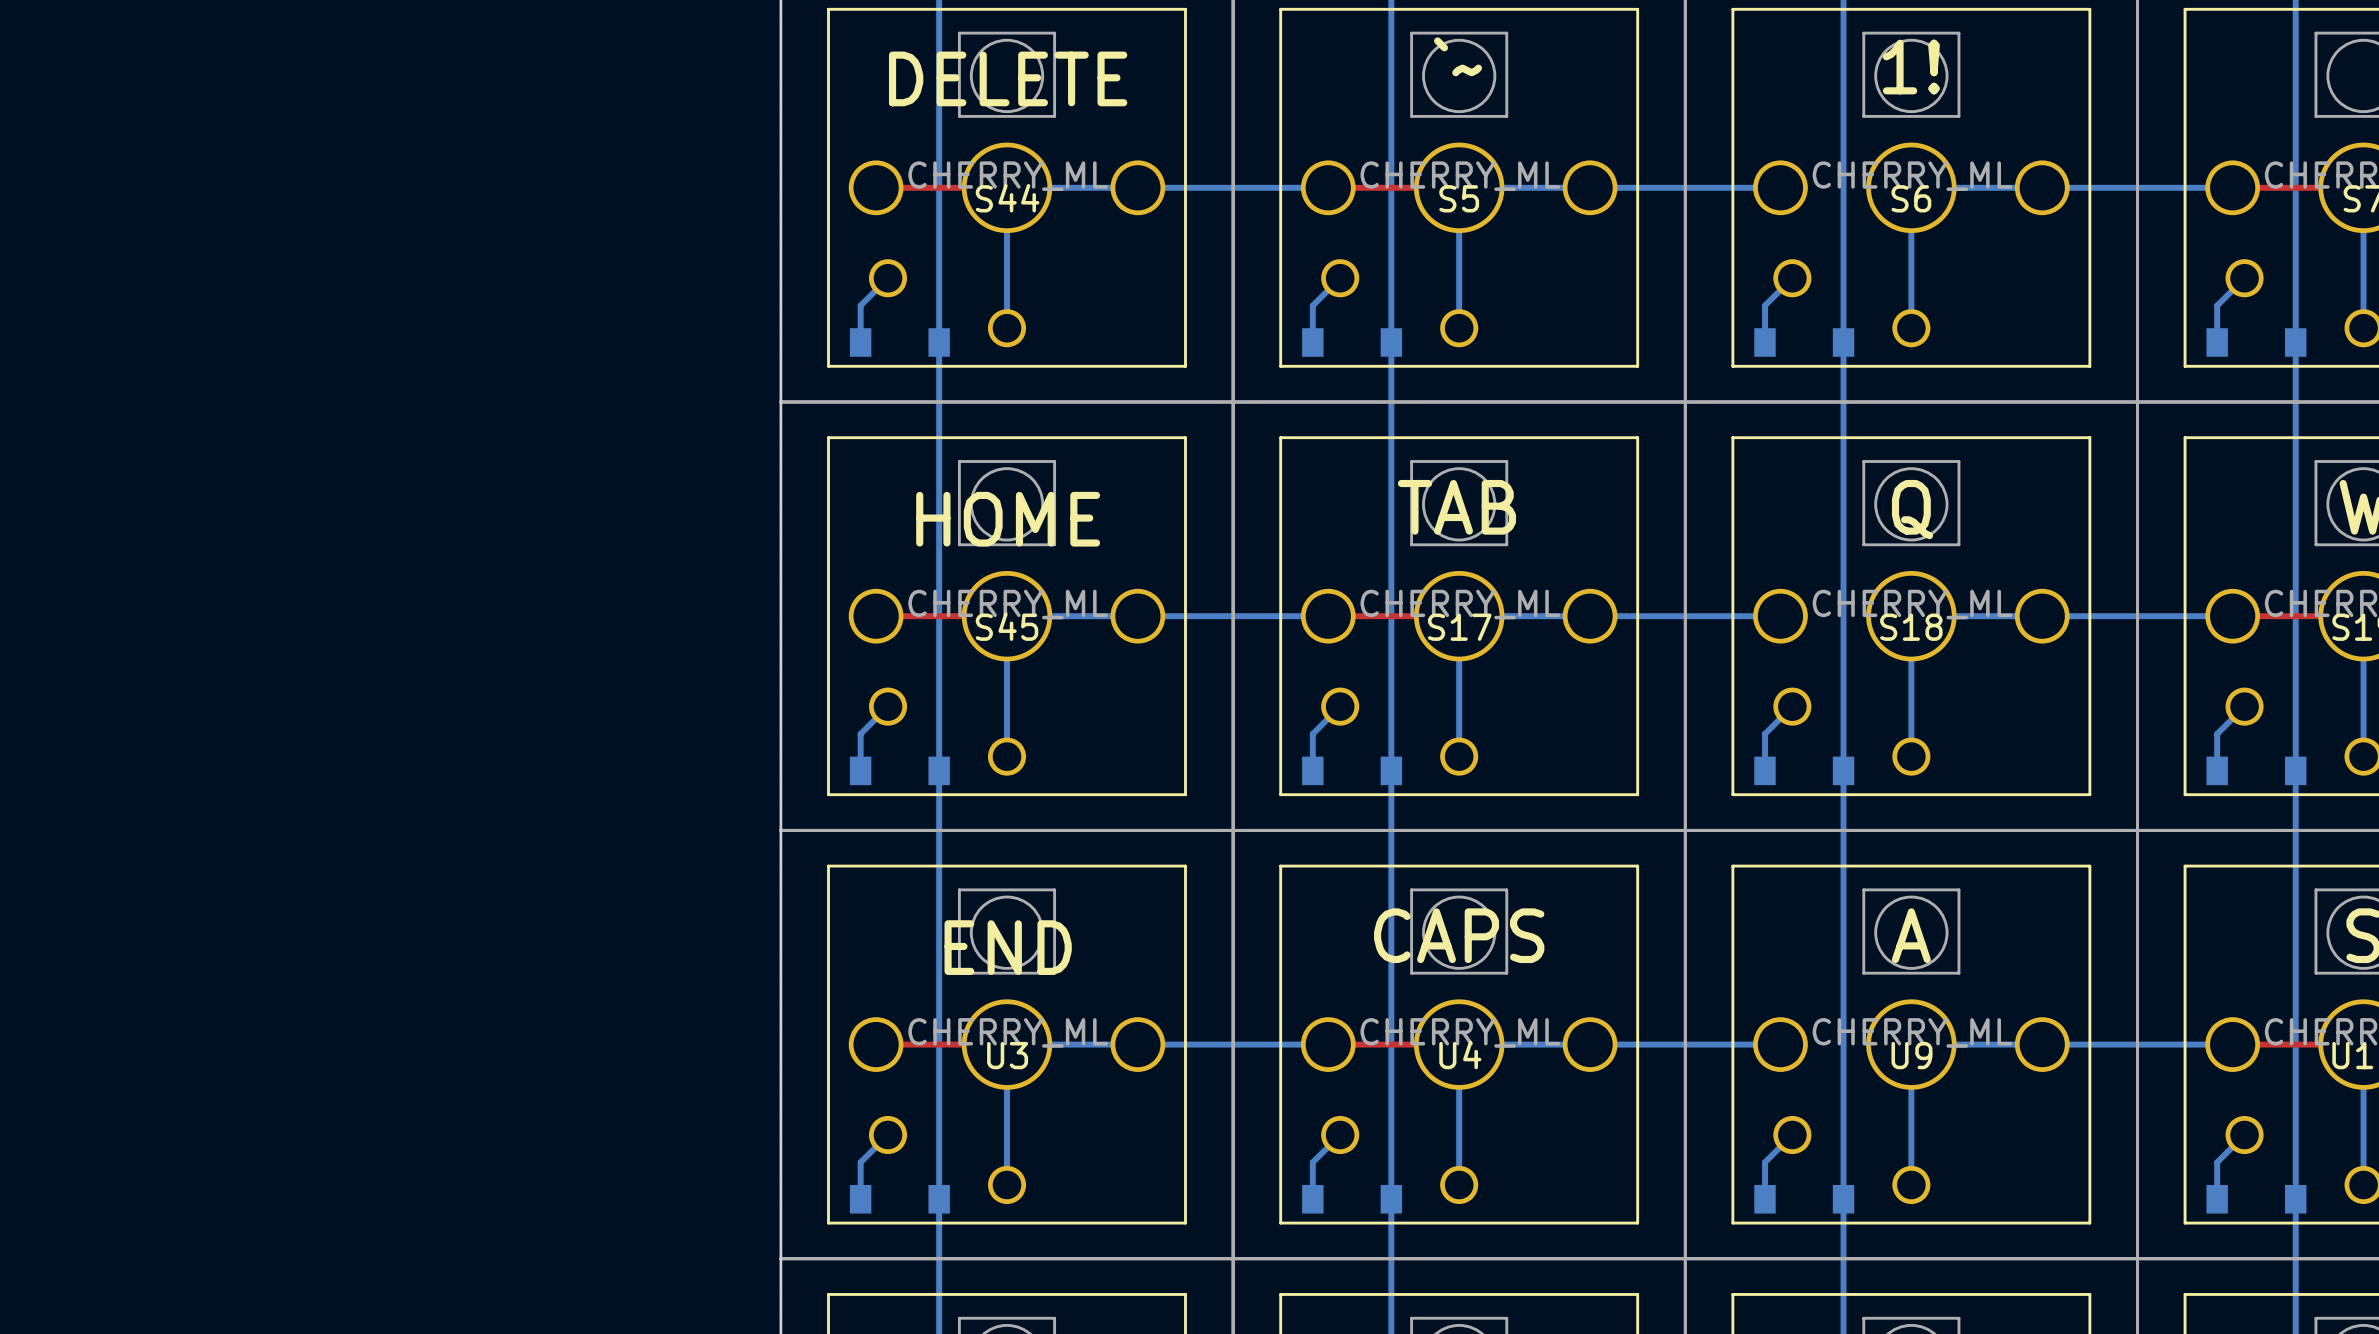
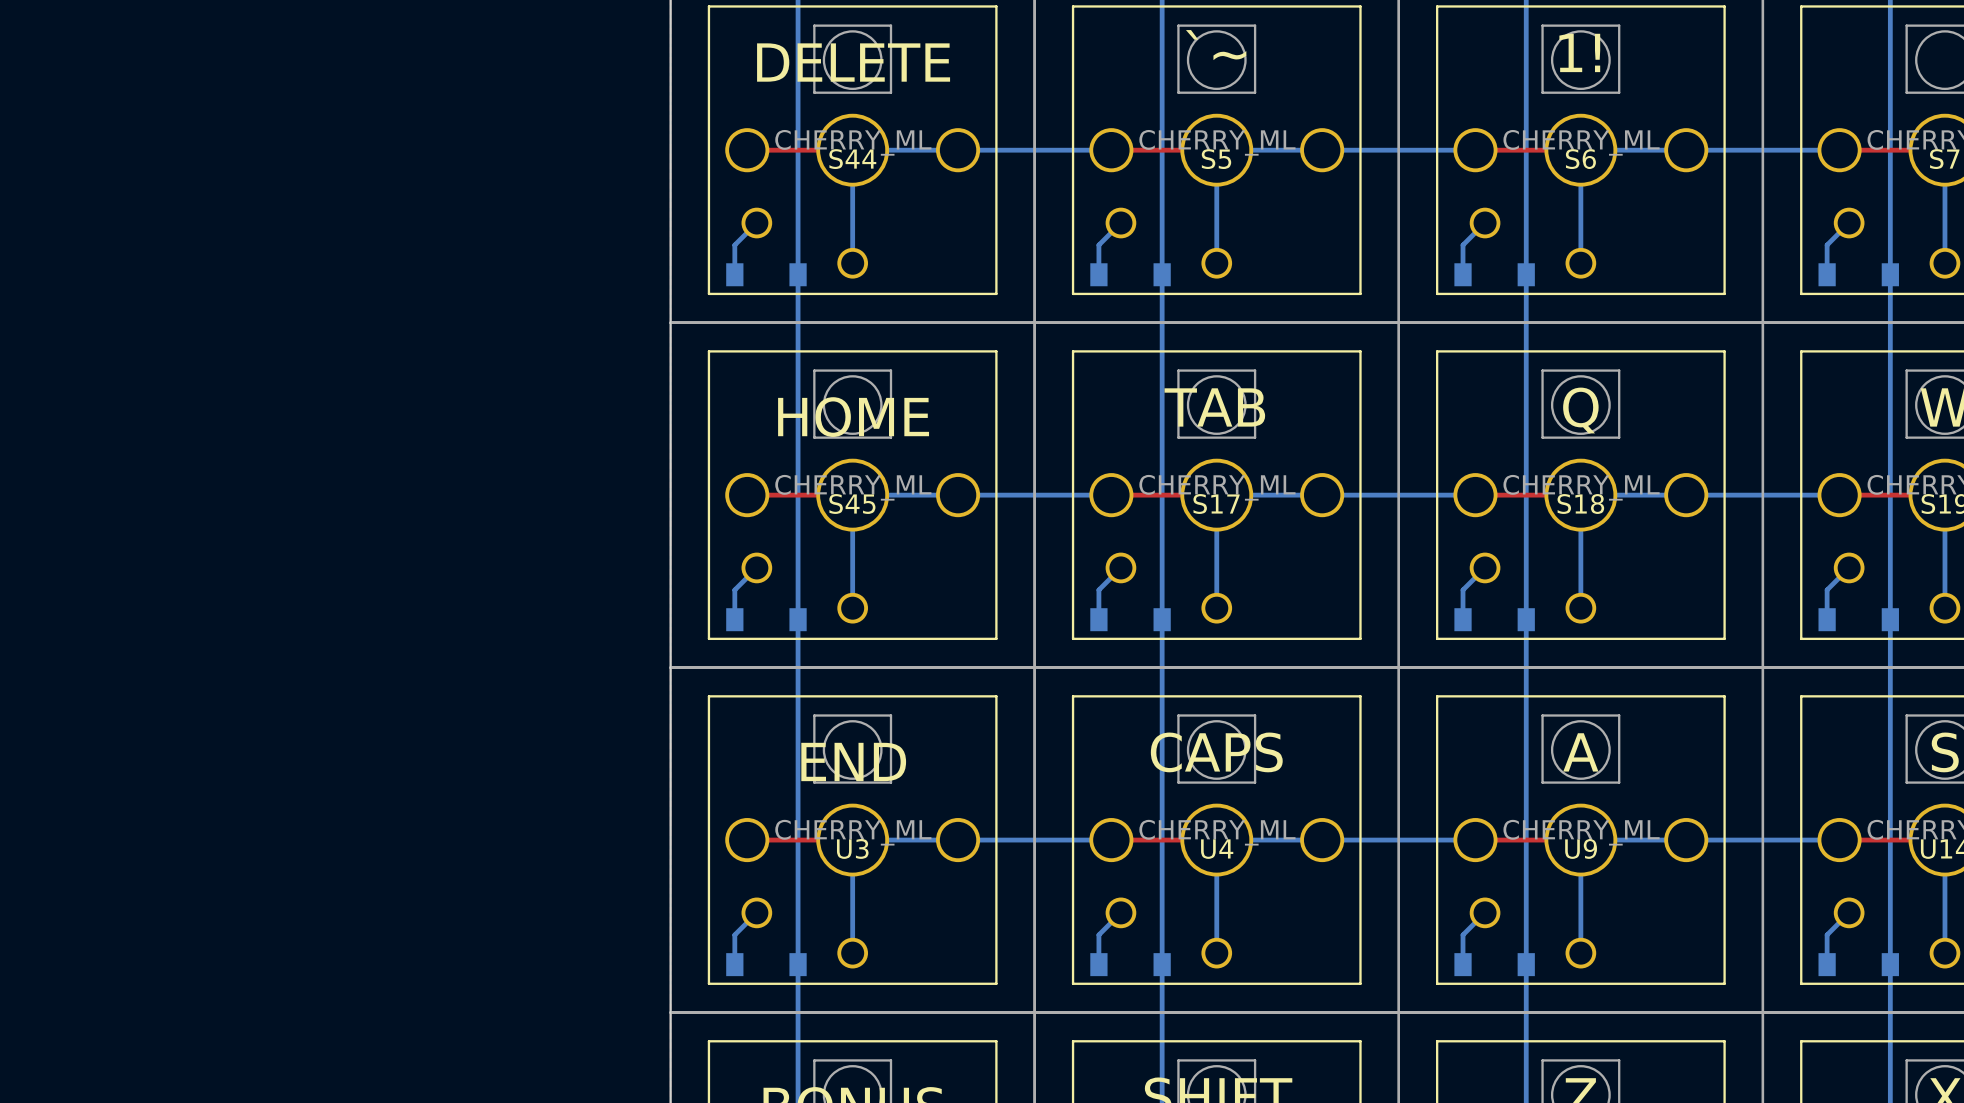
top track: none -> (1475, 150) (1580, 150)
top track: none -> (1475, 495) (1580, 495)
top track: none -> (1475, 840) (1580, 840)

